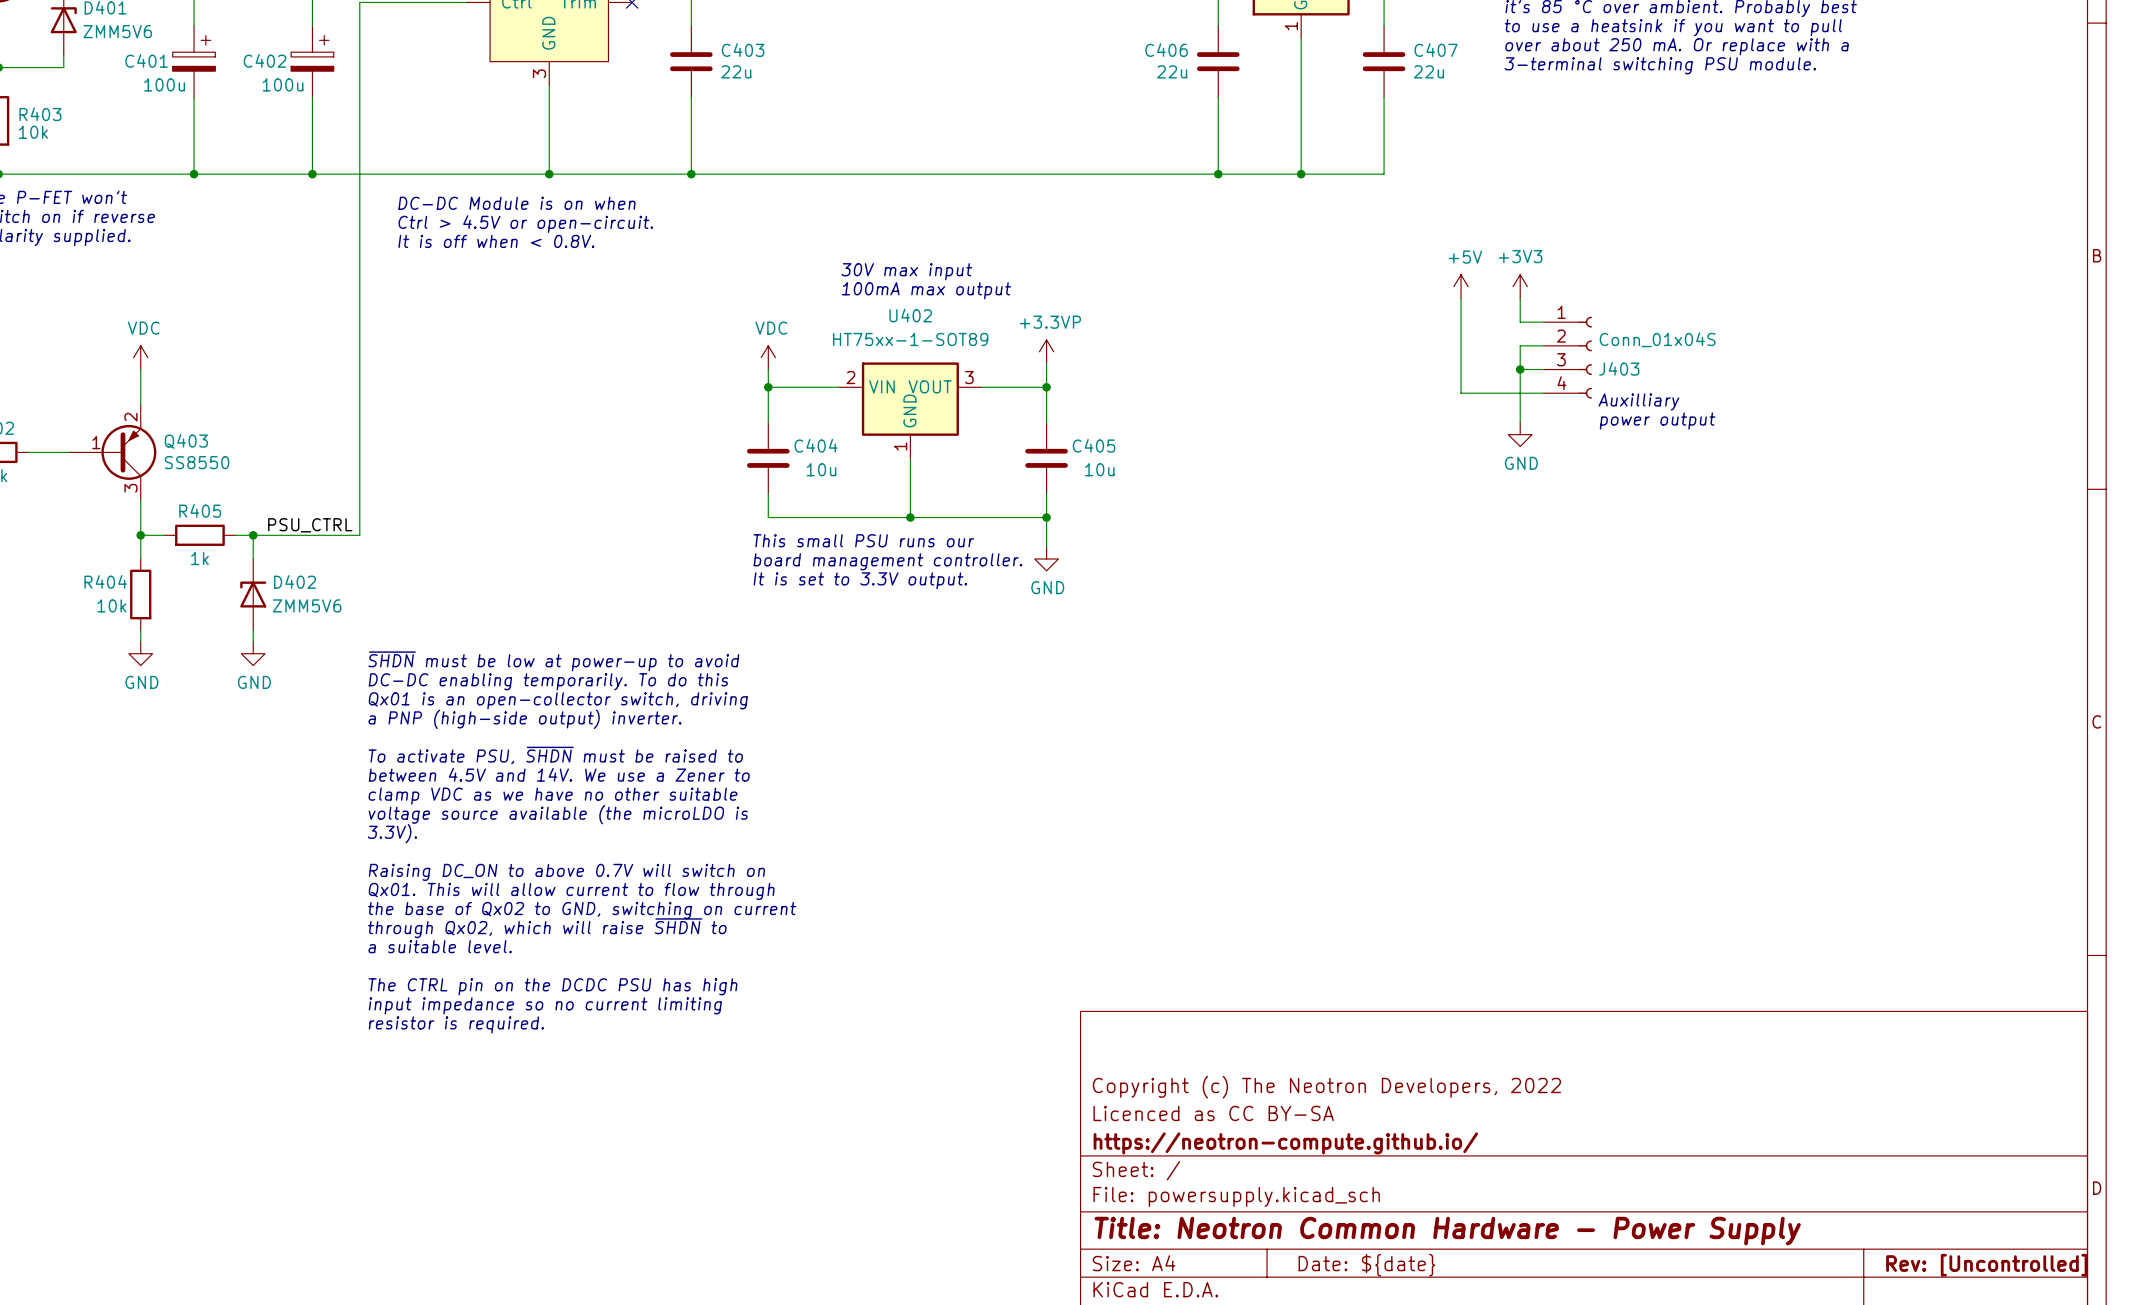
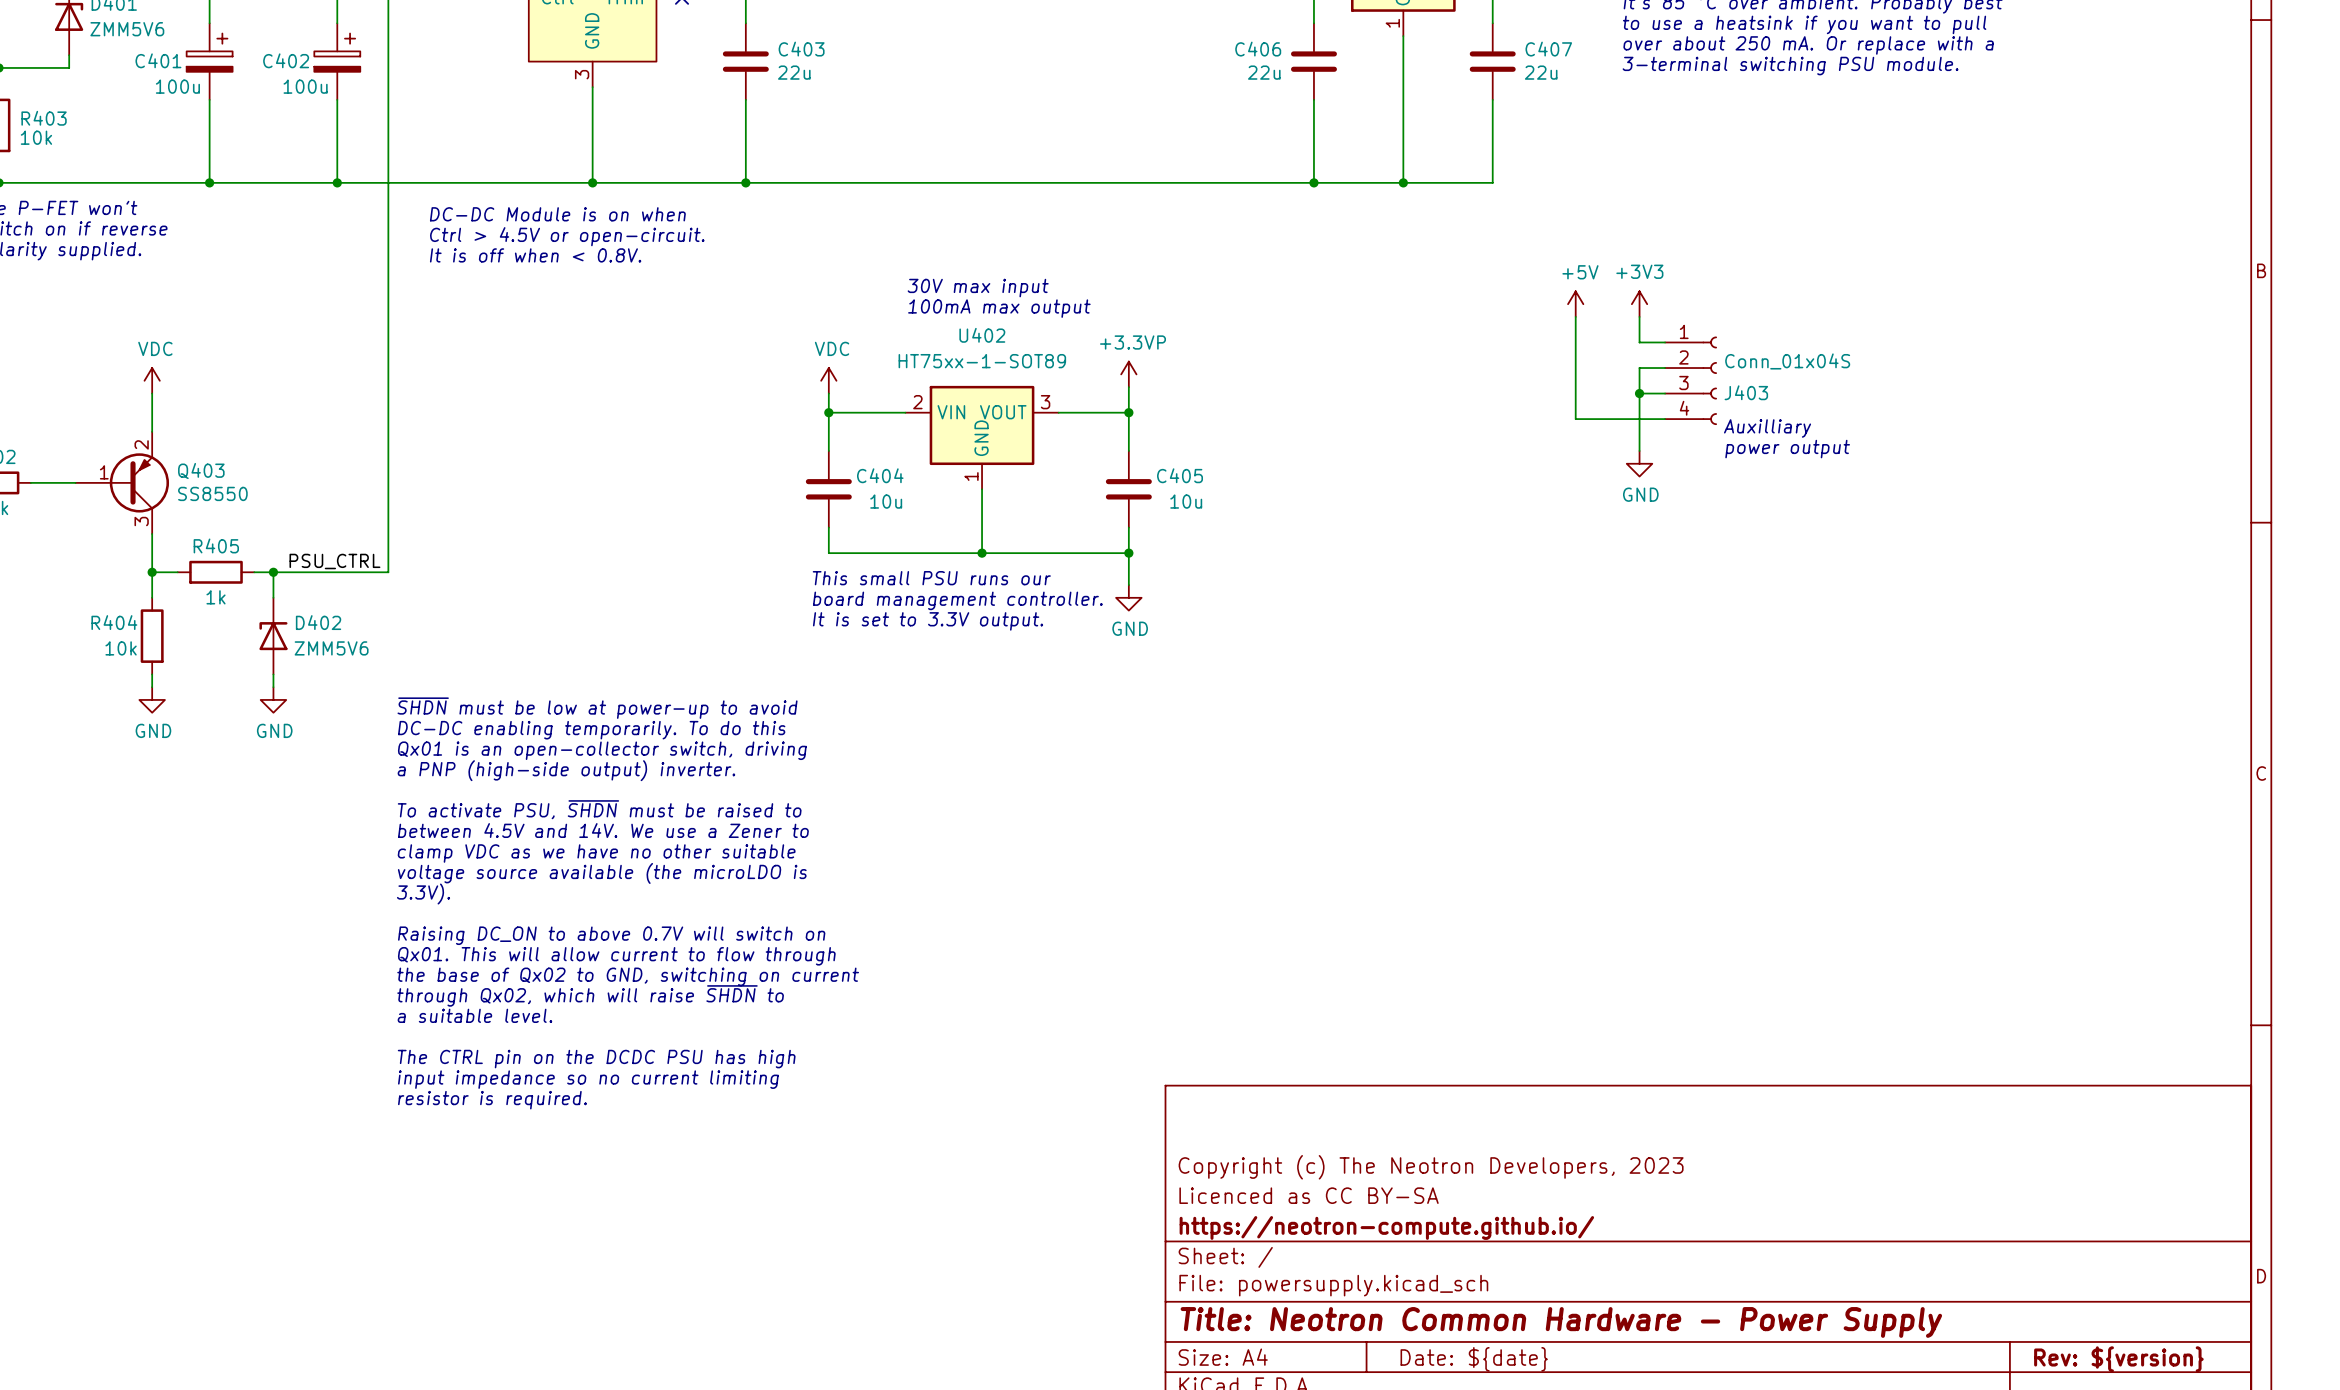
title block: Copyright (c) The Neotron Developers, 2022 (1326, 1087) -> Copyright (c) The Neotron Developers, 2023 (1431, 1167)
title block: Rev: [Uncontrolled] (1986, 1265) -> Rev: ${version} (2118, 1359)

